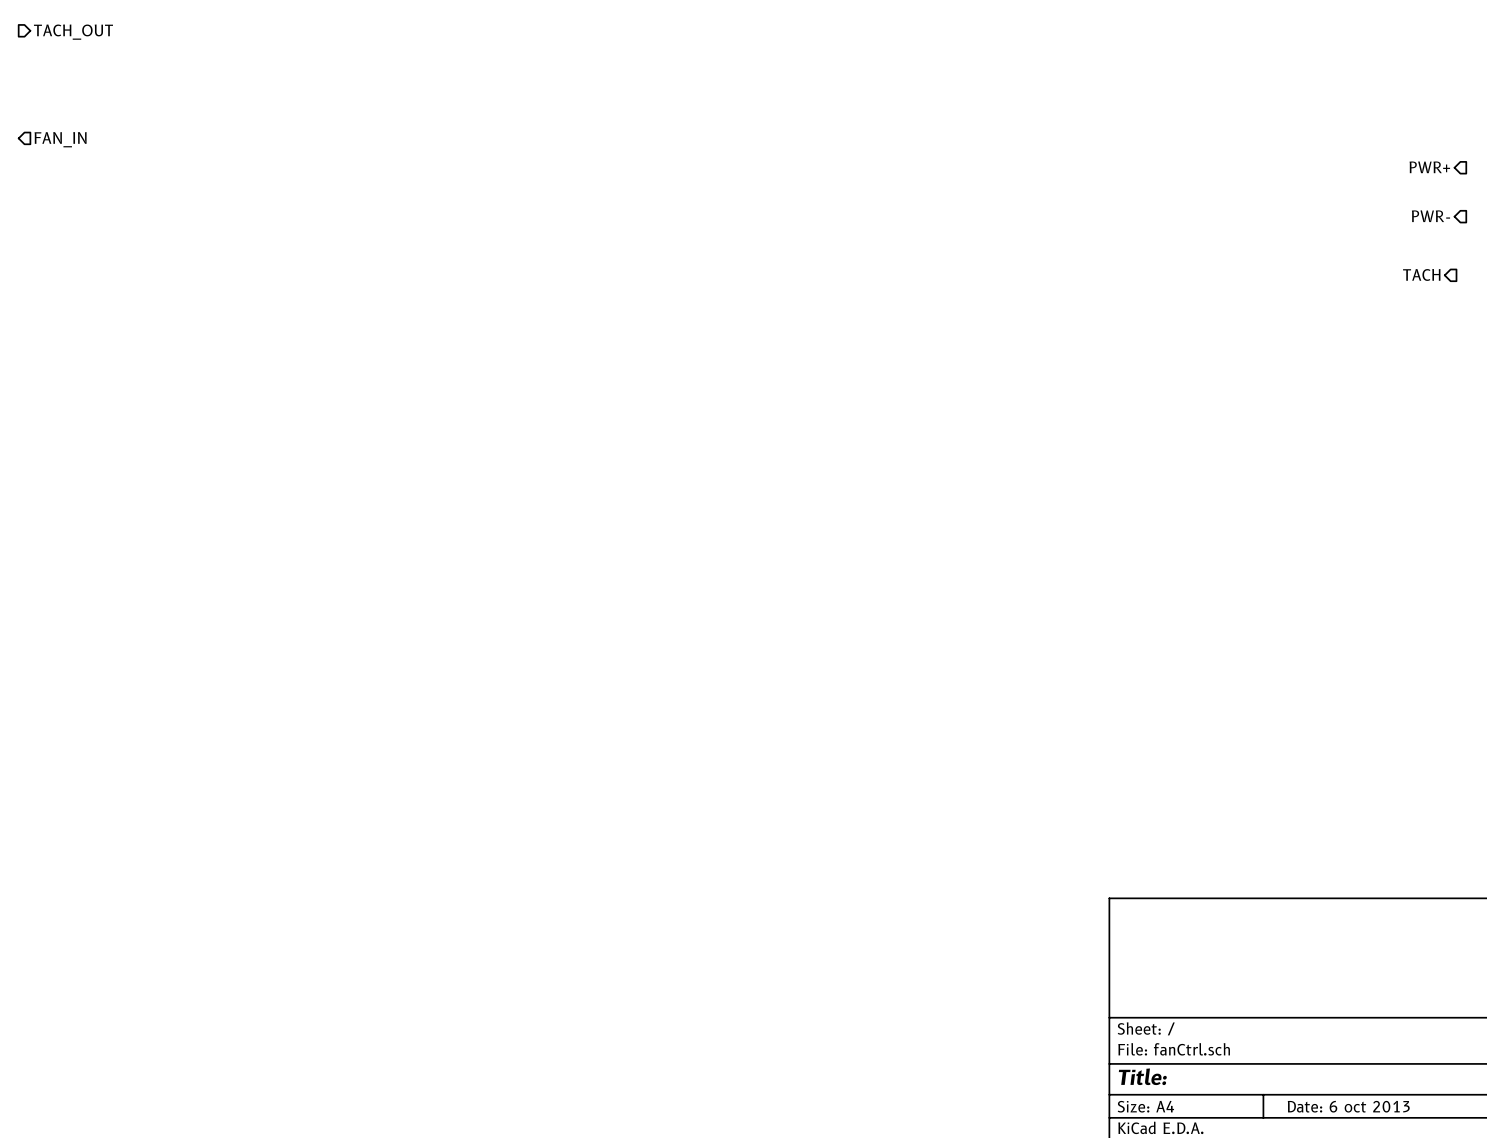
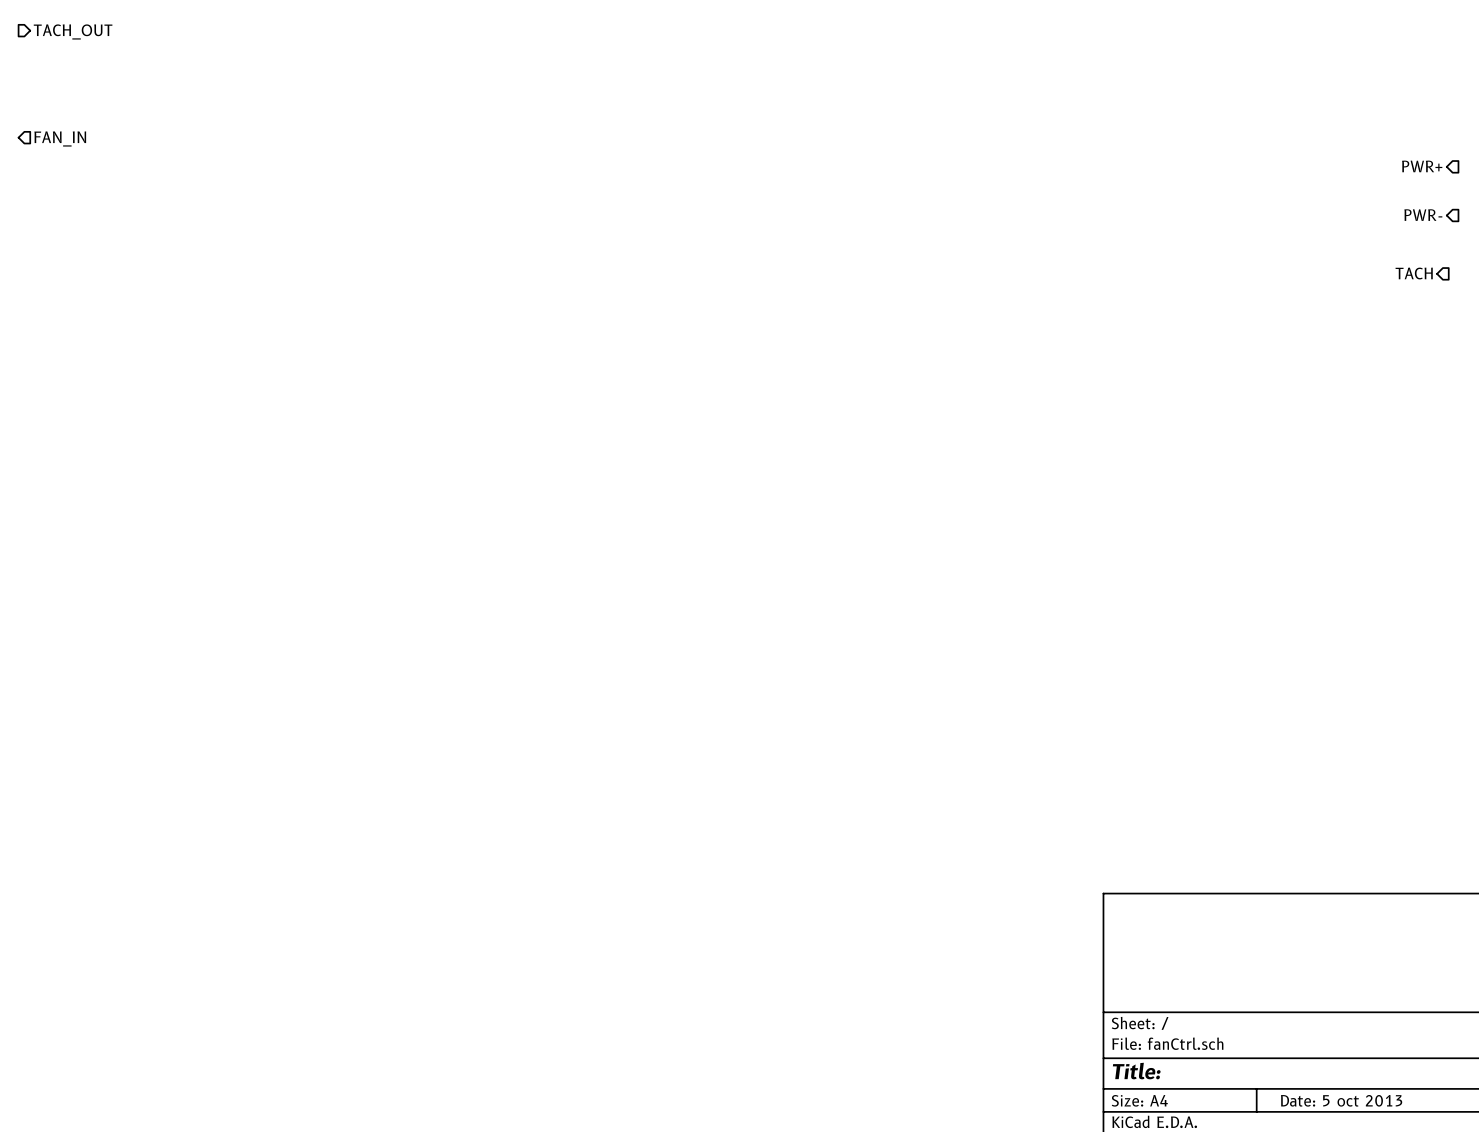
title block: Date: 6 oct 2013 (1348, 1106) -> Date: 5 oct 2013 (1341, 1100)

